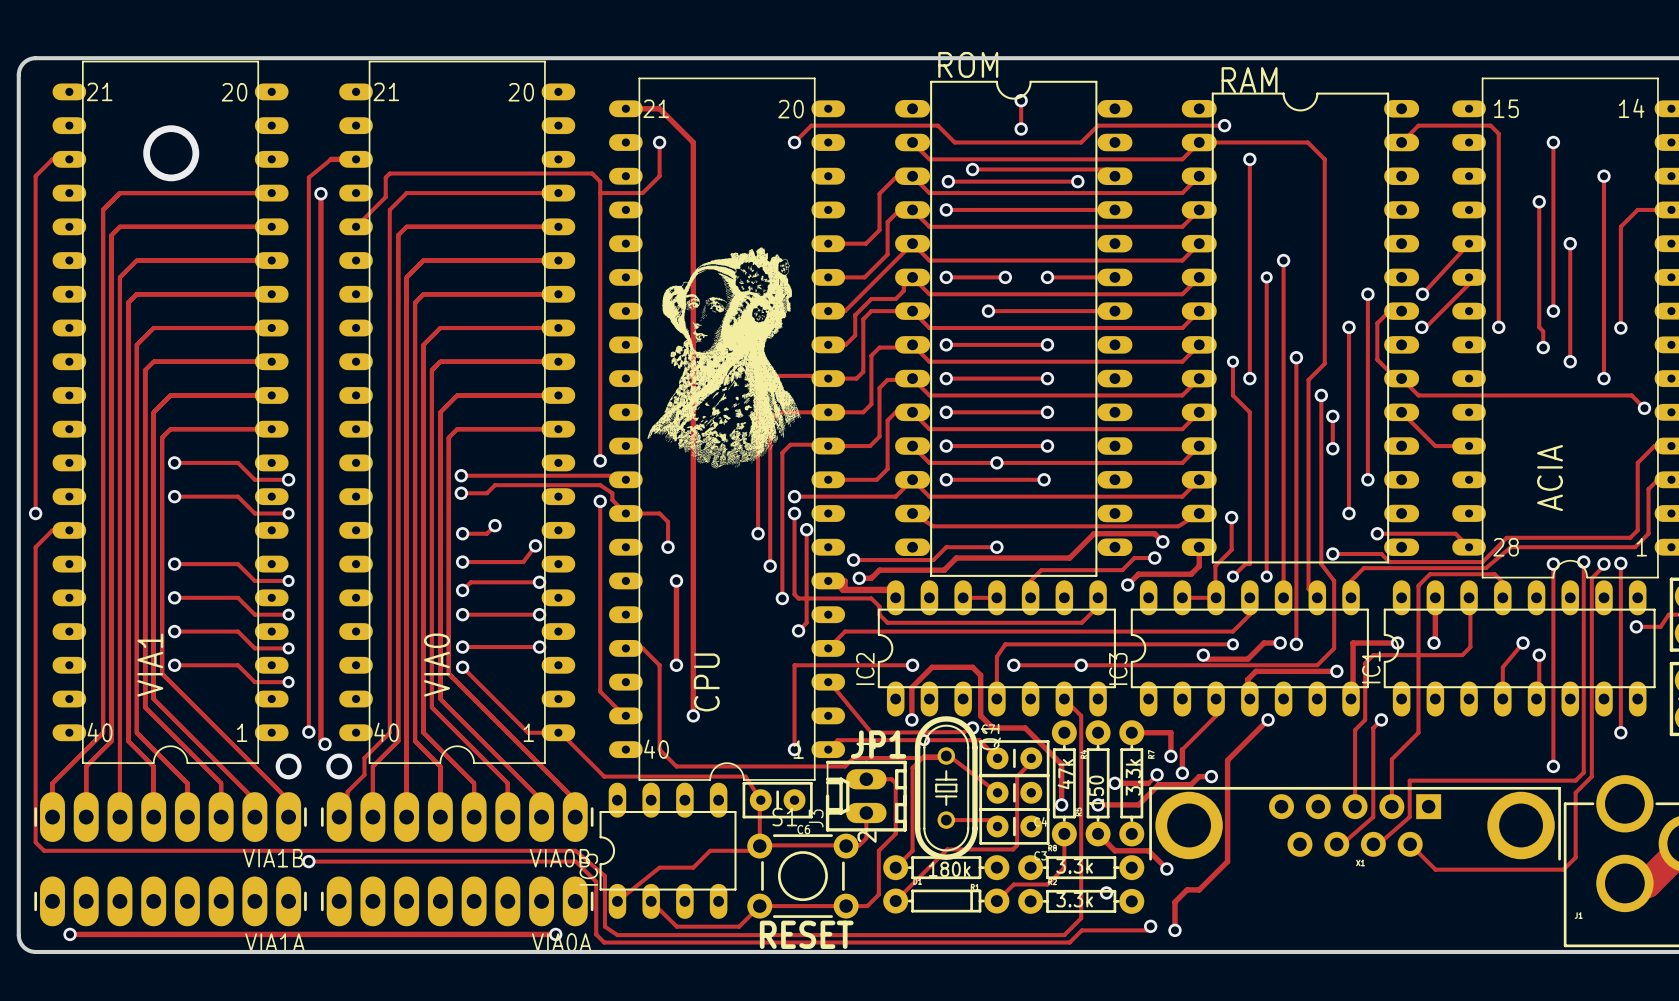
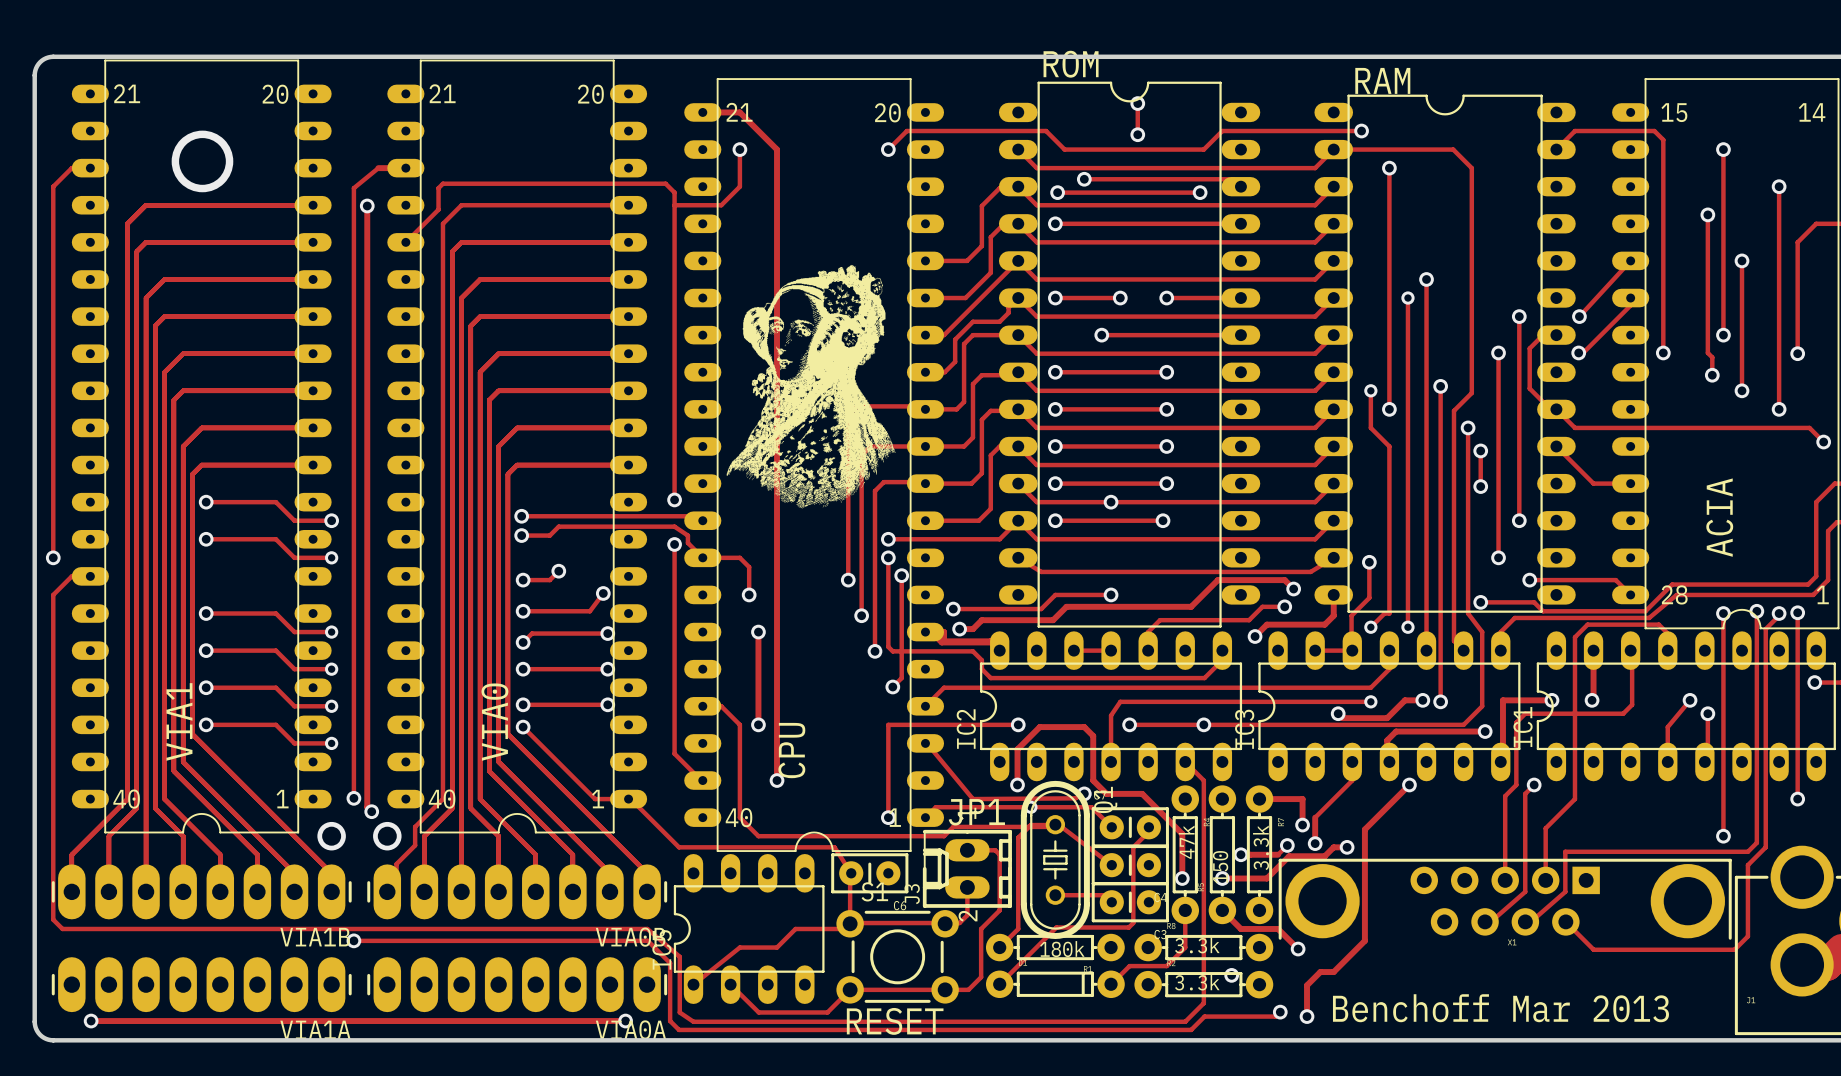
text: none -> Benchoff Mar 2013 (1500, 1008)

